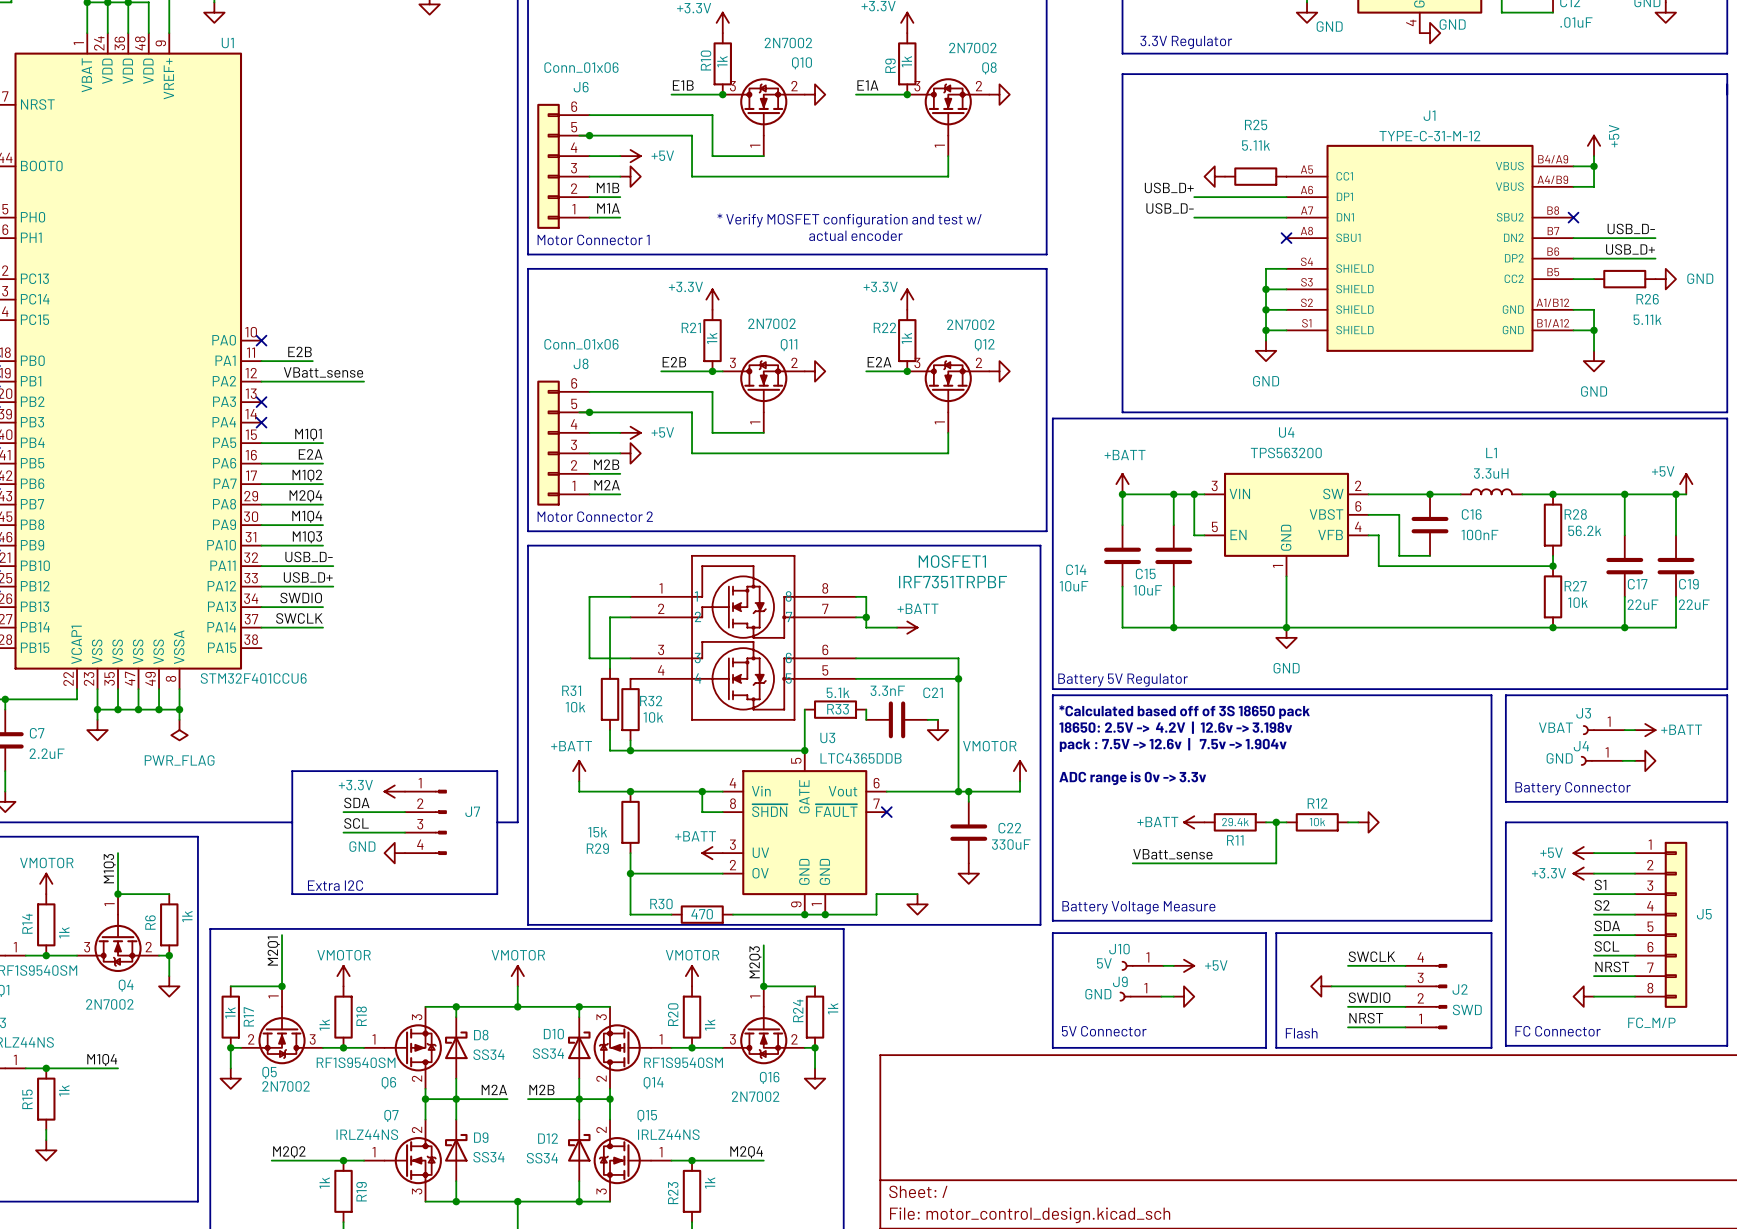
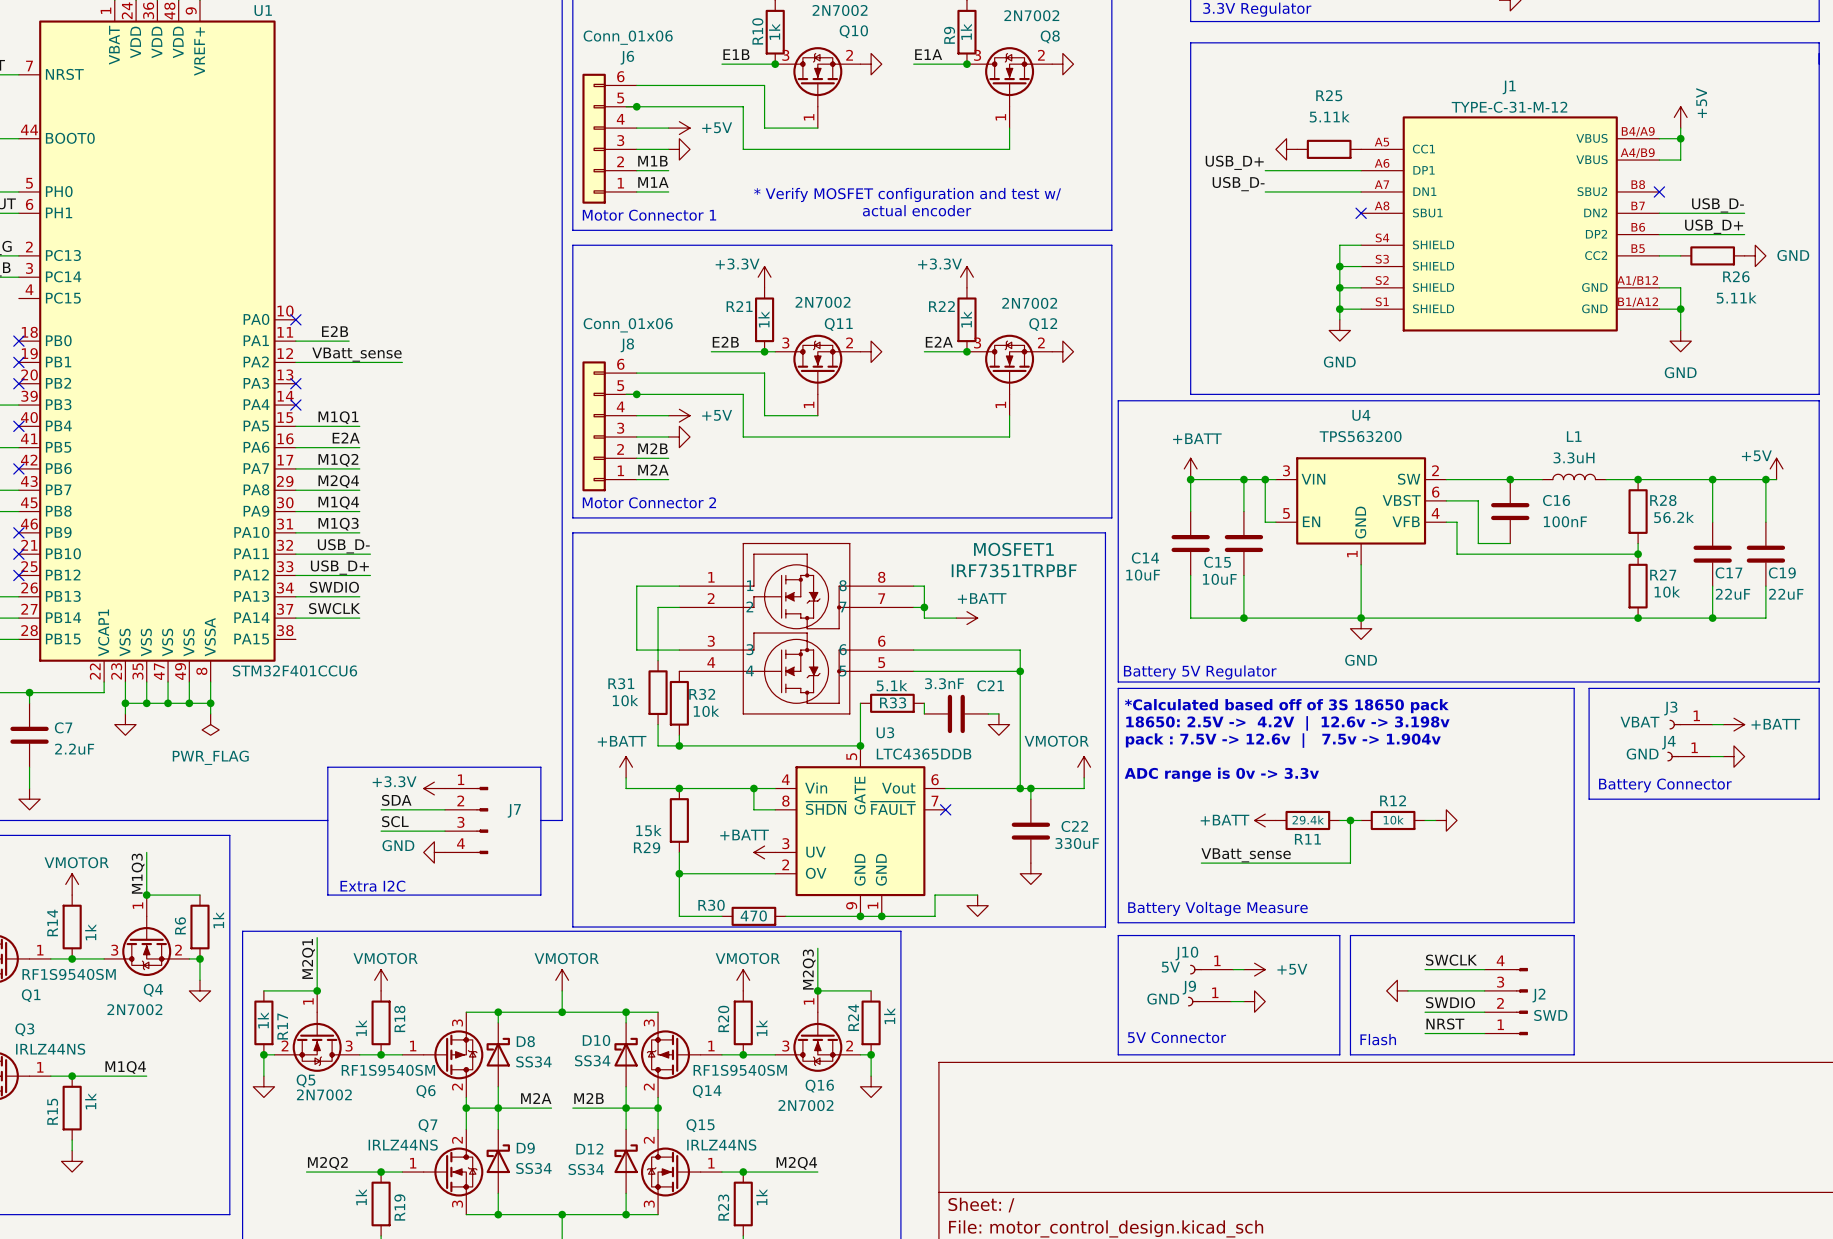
line: (1505, 822) (1727, 822) (1727, 1045) (1505, 1045) (1505, 822) -> none
power symbol: +5V (1583, 853) -> none
wire: (1594, 853) (1635, 853) -> none
power symbol: +3.3V (1583, 873) -> none
wire: (1594, 873) (1635, 873) -> none
label: S1 (1600, 884) -> none
wire: (1594, 894) (1635, 894) -> none
label: S2 (1602, 905) -> none
wire: (1594, 914) (1635, 914) -> none
J5: FC_M/P (1661, 924) -> none
label: SDA (1607, 925) -> none
wire: (1594, 935) (1635, 935) -> none
label: SCL (1607, 946) -> none
wire: (1594, 955) (1635, 955) -> none
label: NRST (1612, 966) -> none
wire: (1594, 976) (1635, 976) -> none
power symbol: (1583, 996) -> none
wire: (1594, 996) (1635, 996) -> none
text: FC Connector (1558, 1031) -> none

